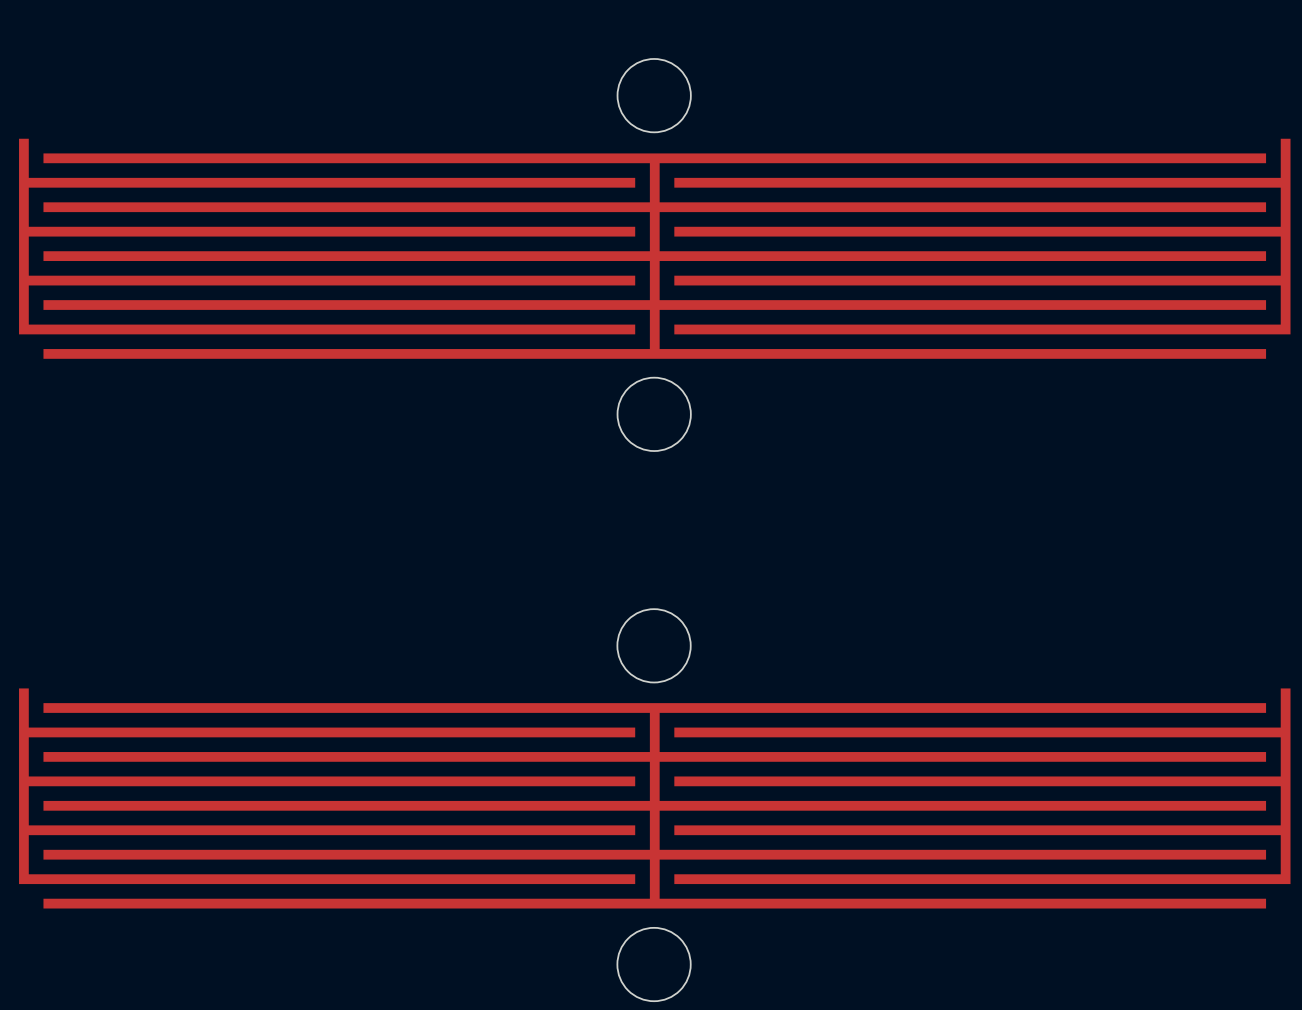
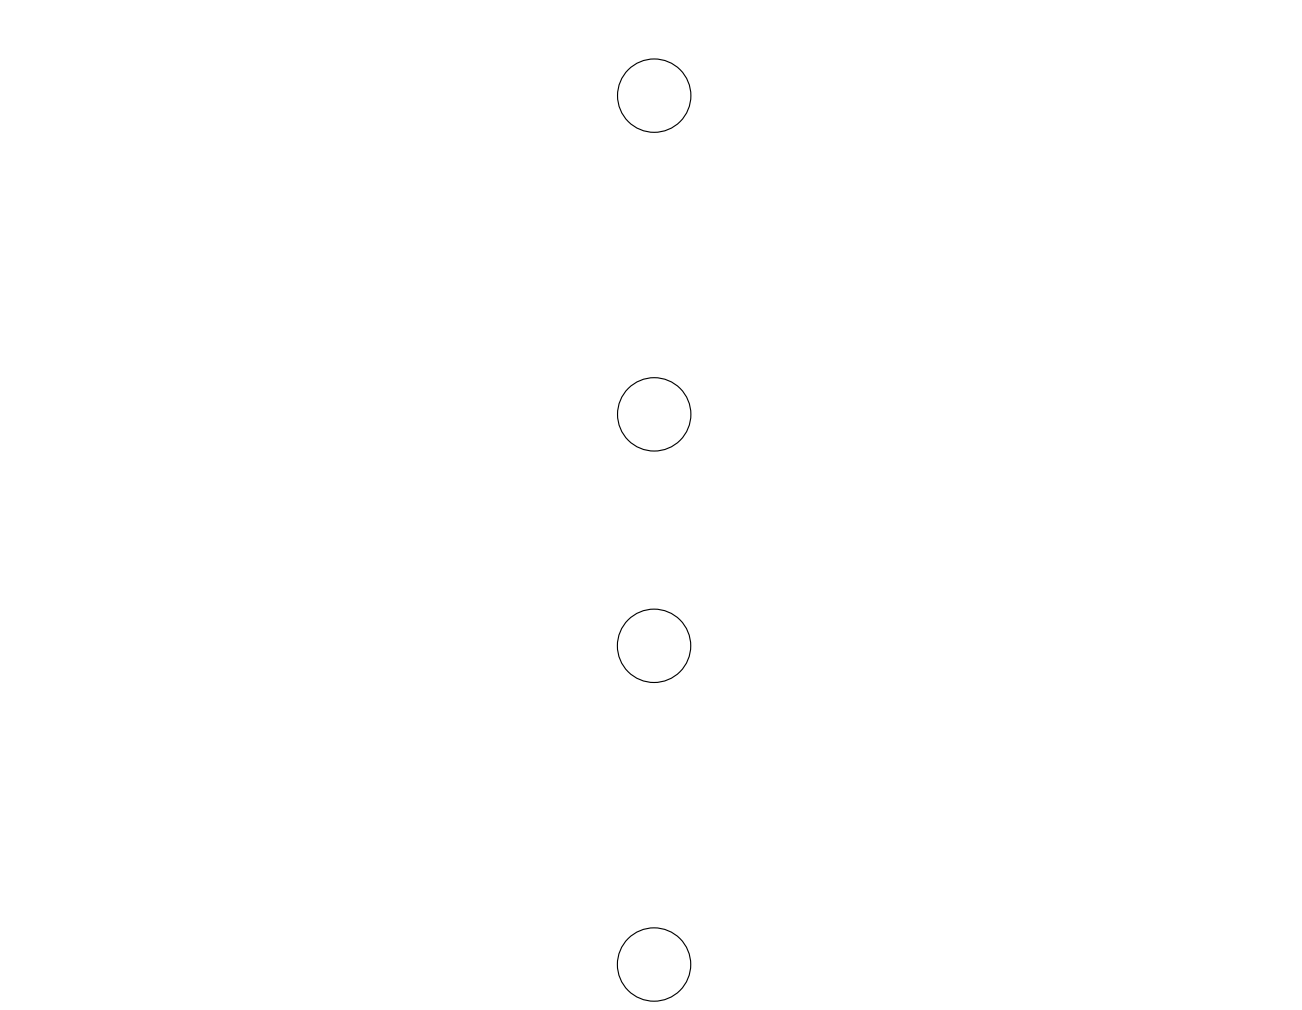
part: (654, 248) -> none
part: (654, 798) -> none

